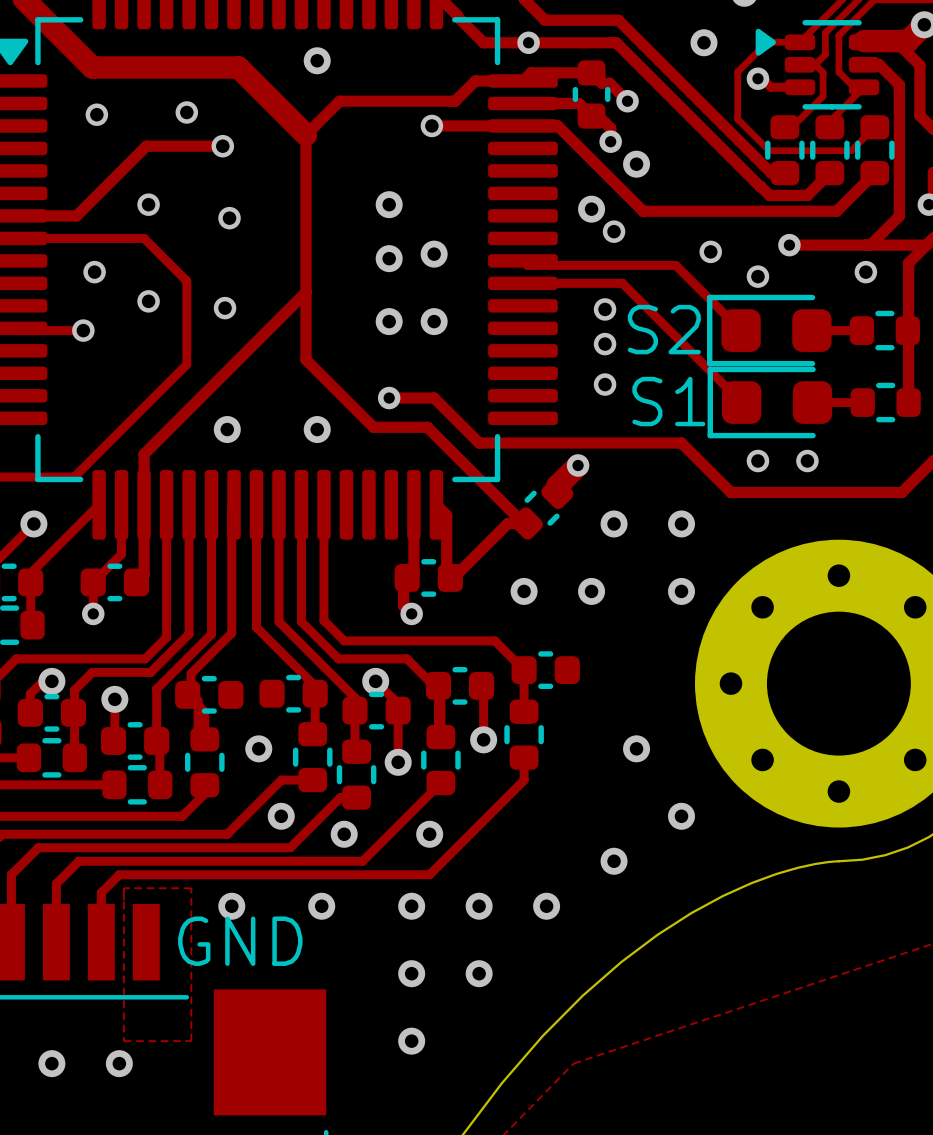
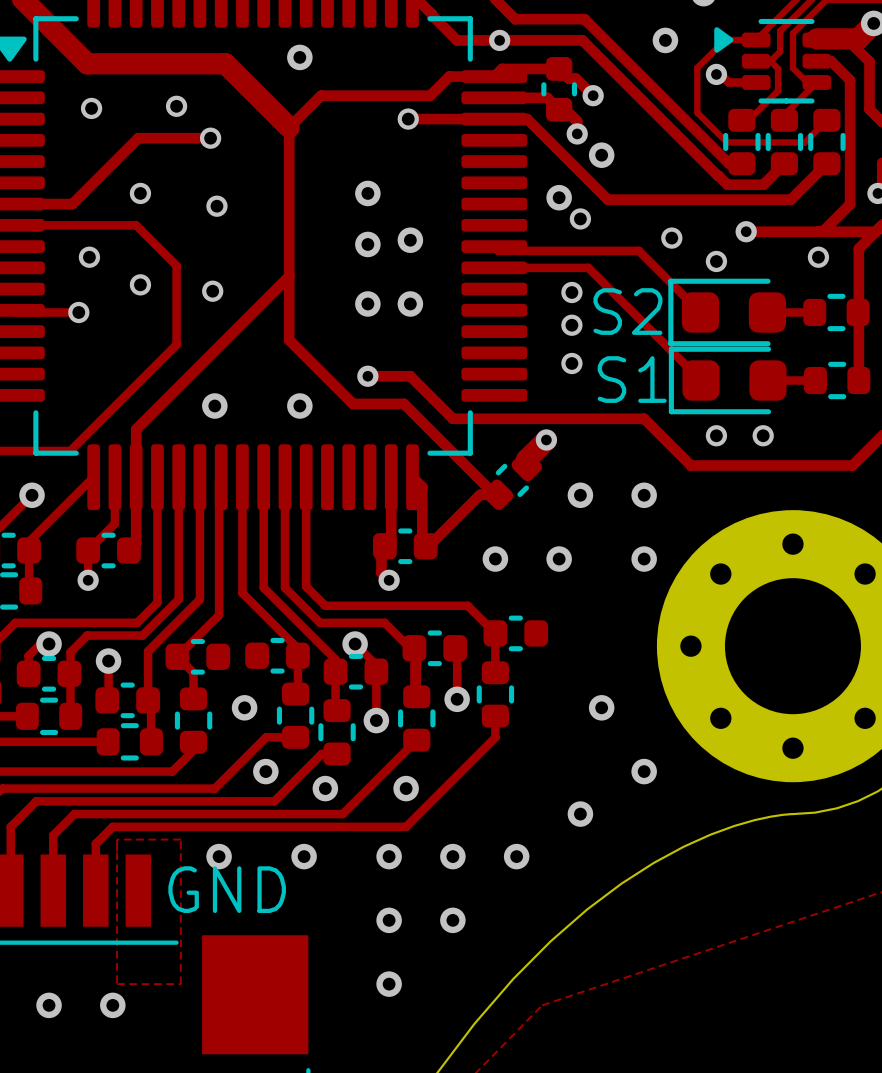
track: (231, 633) (191, 673) (191, 693) (198, 700) (198, 733) -> (219, 598) (219, 615) (180, 653)

